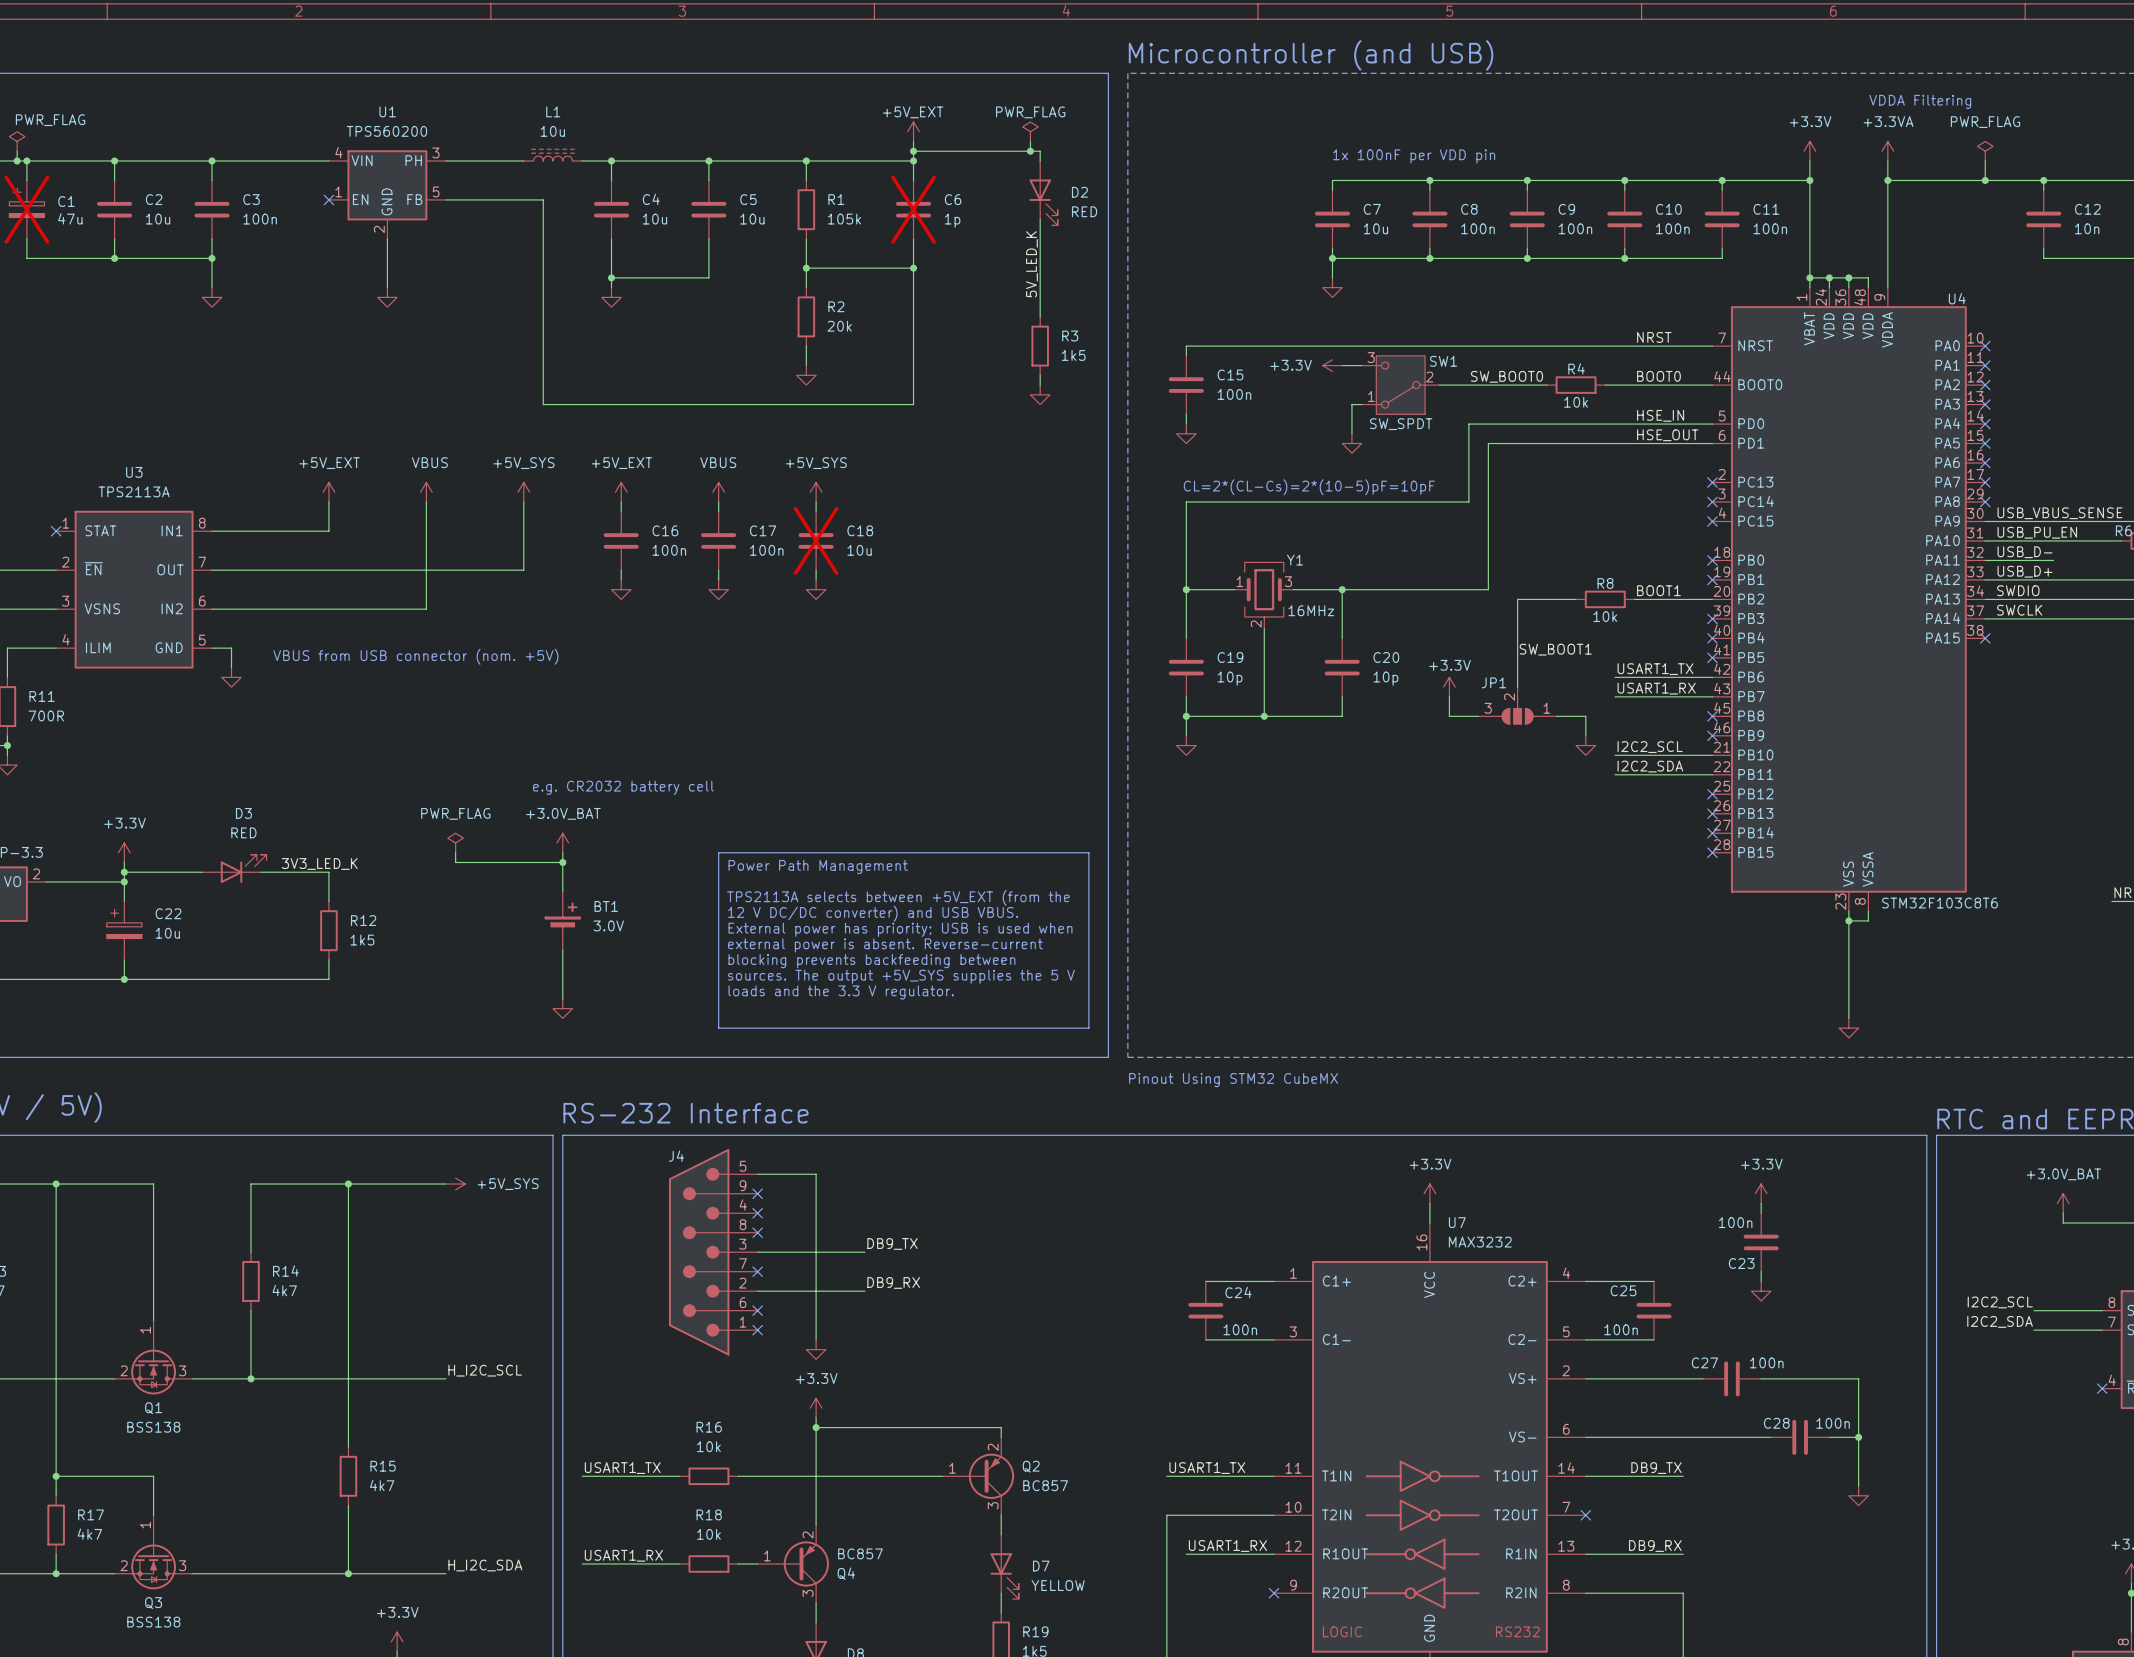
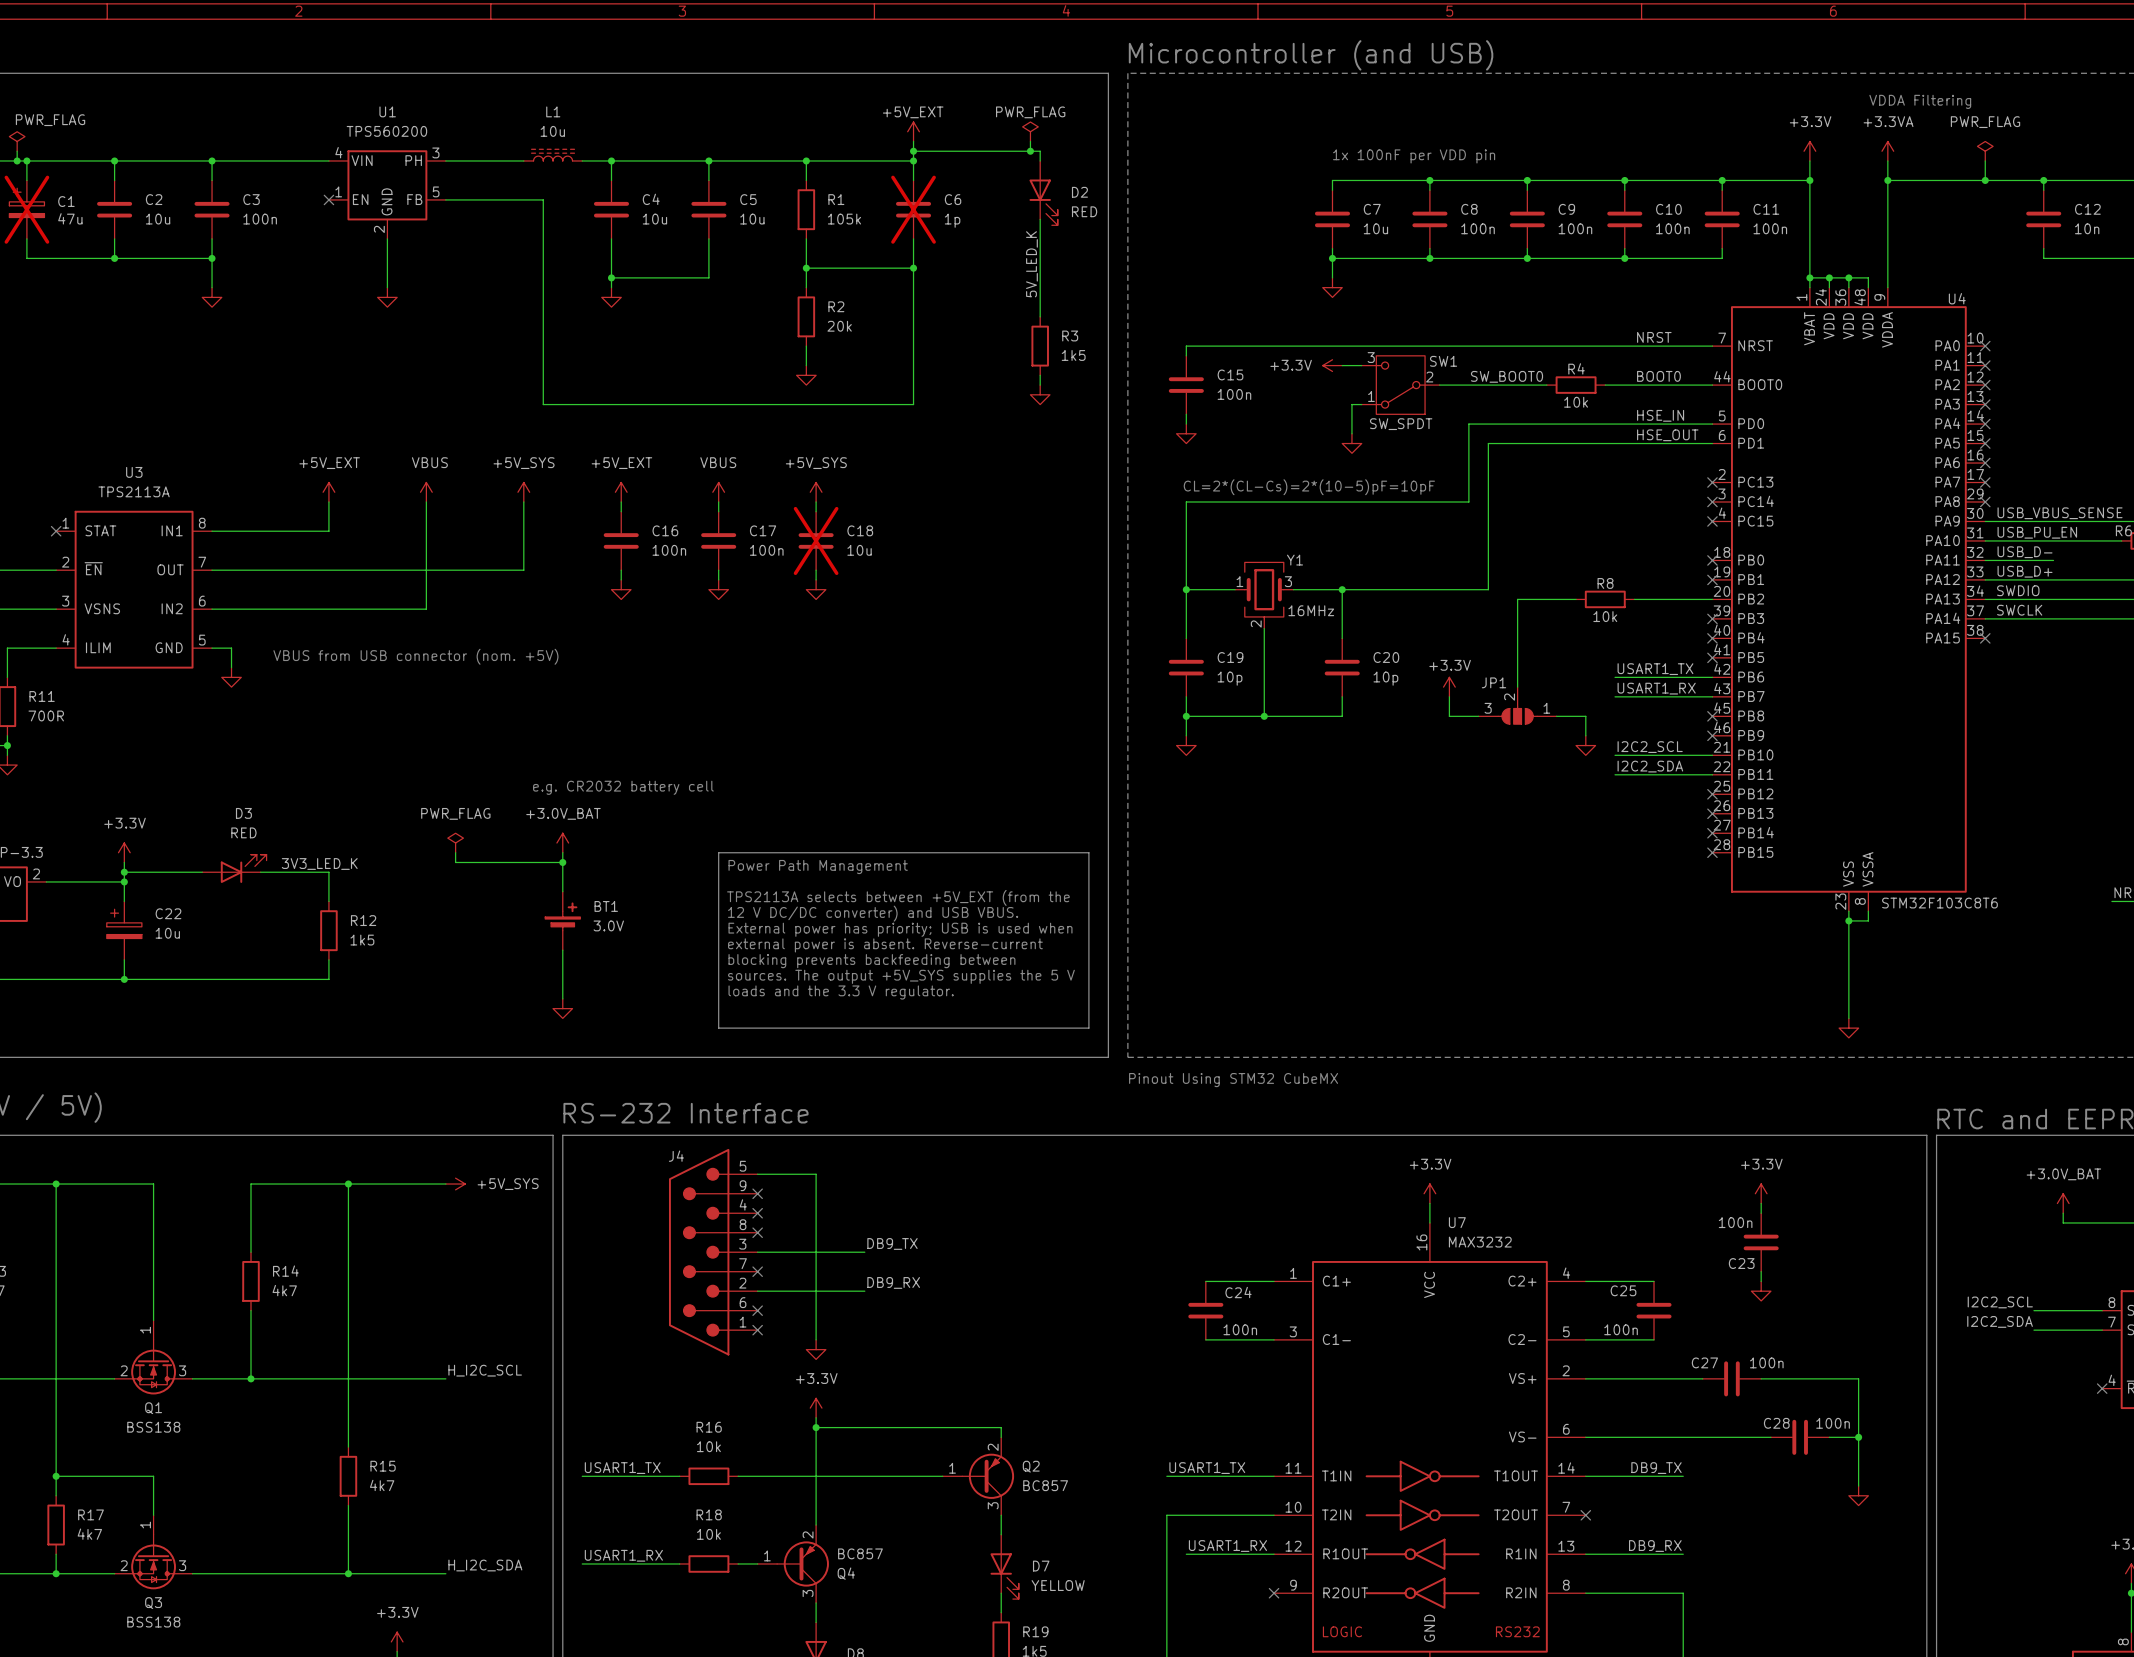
label: BOOT1 (1658, 590) -> none
label: SW_BOOT1 (1555, 649) -> none

